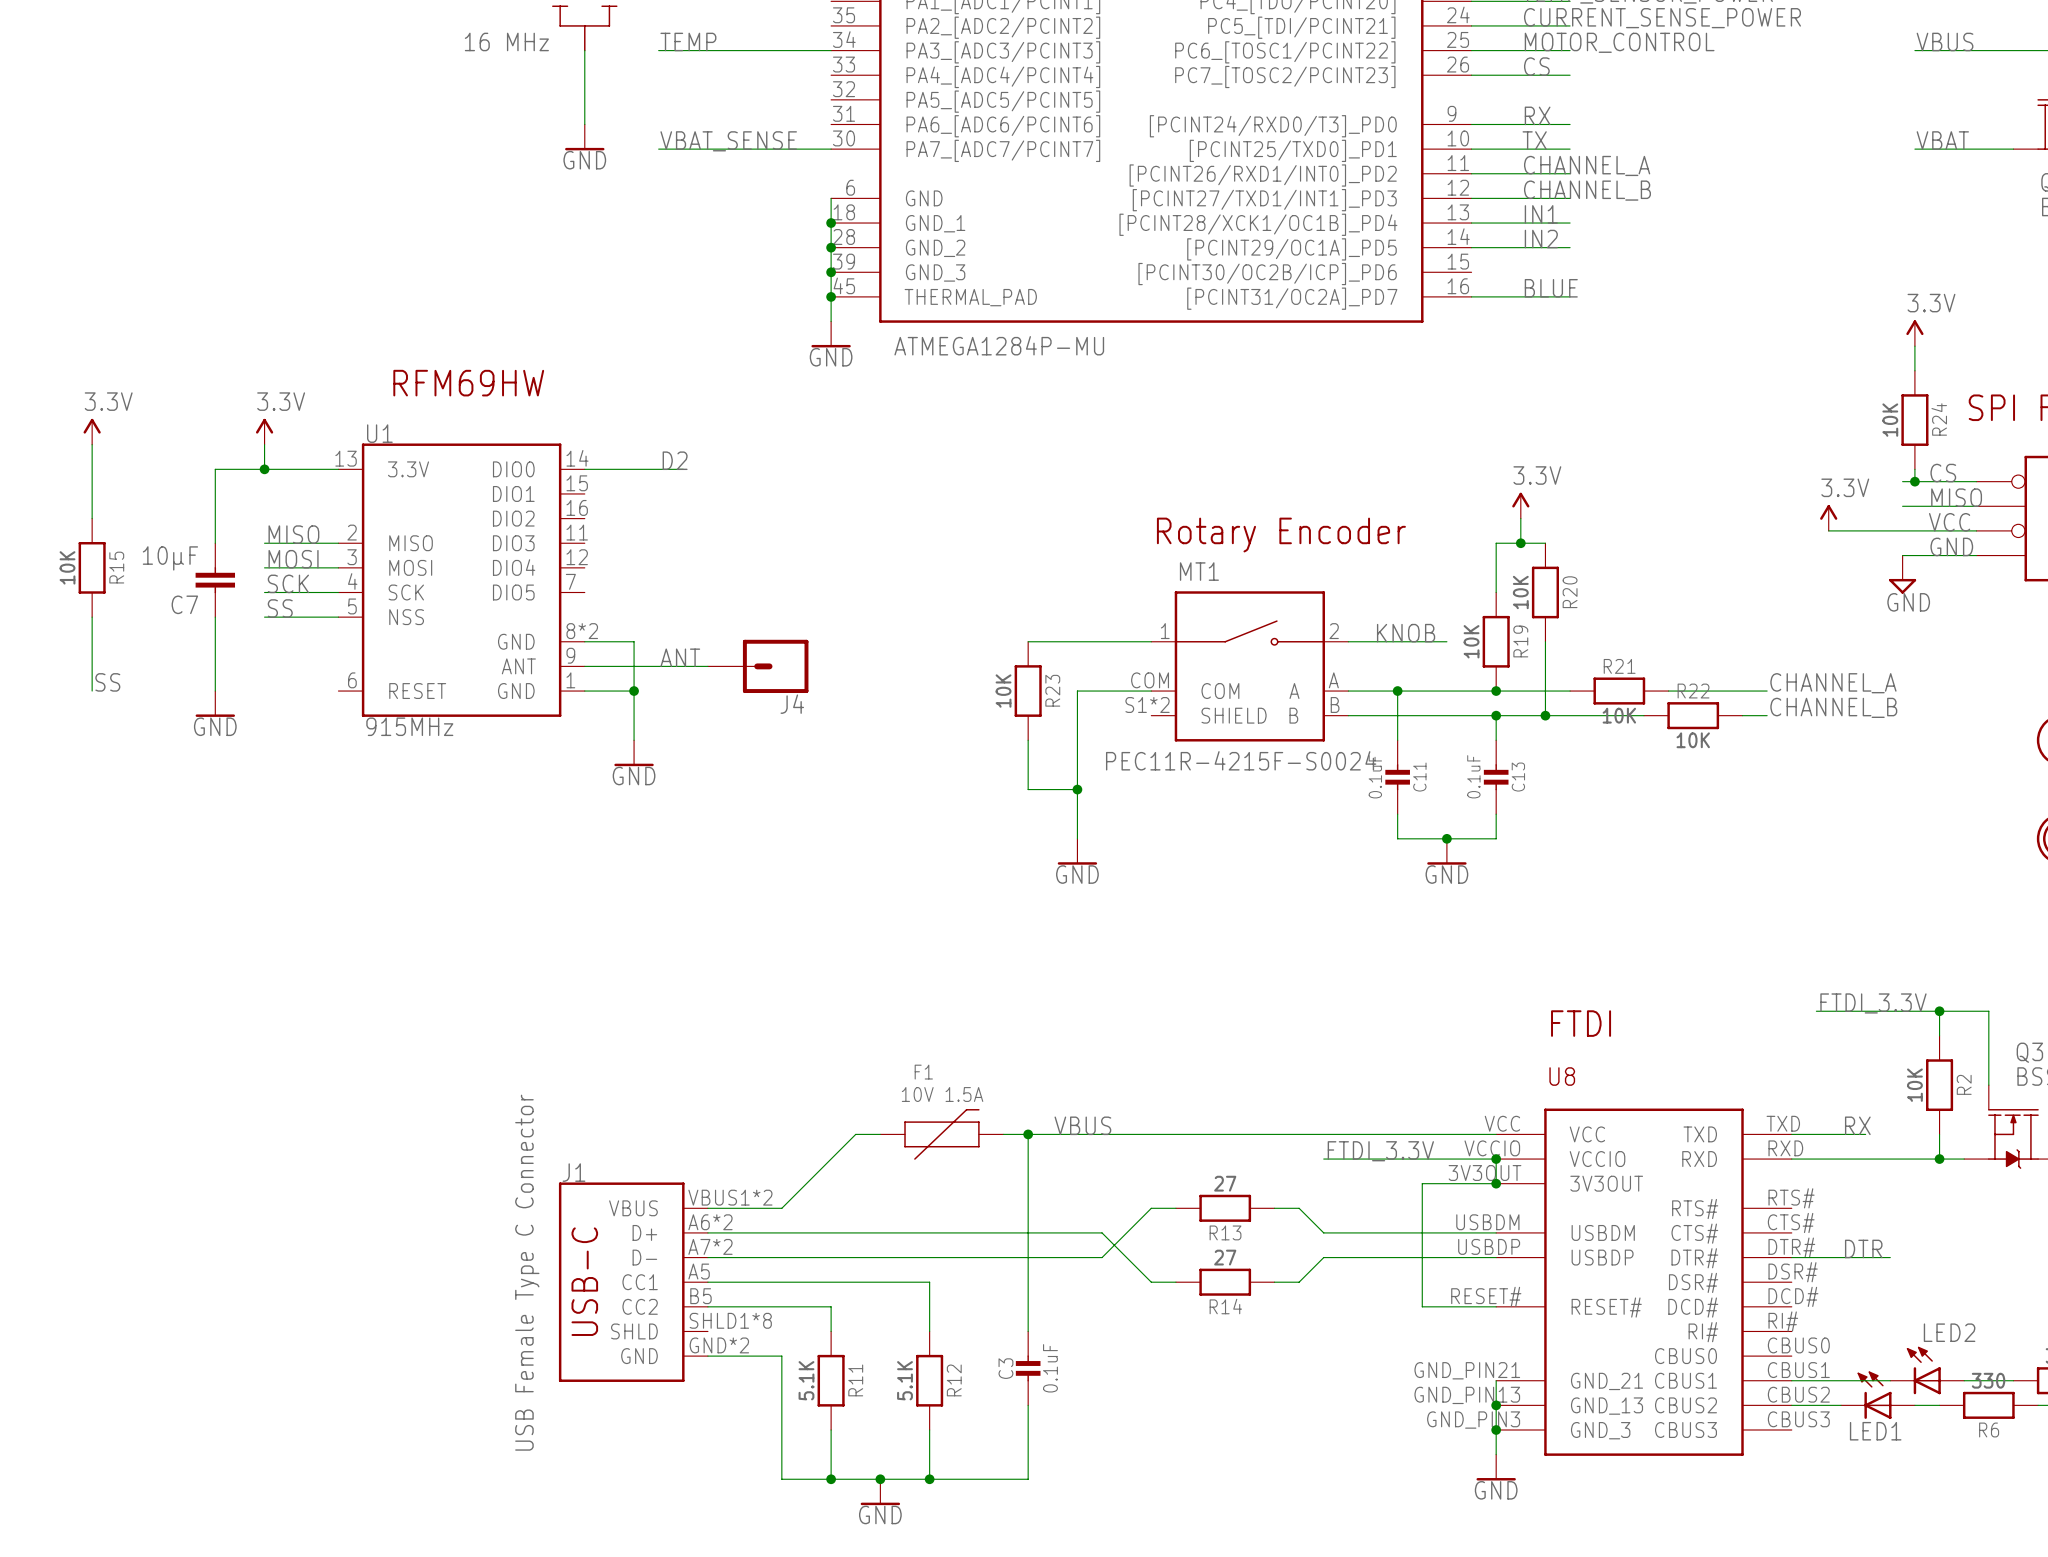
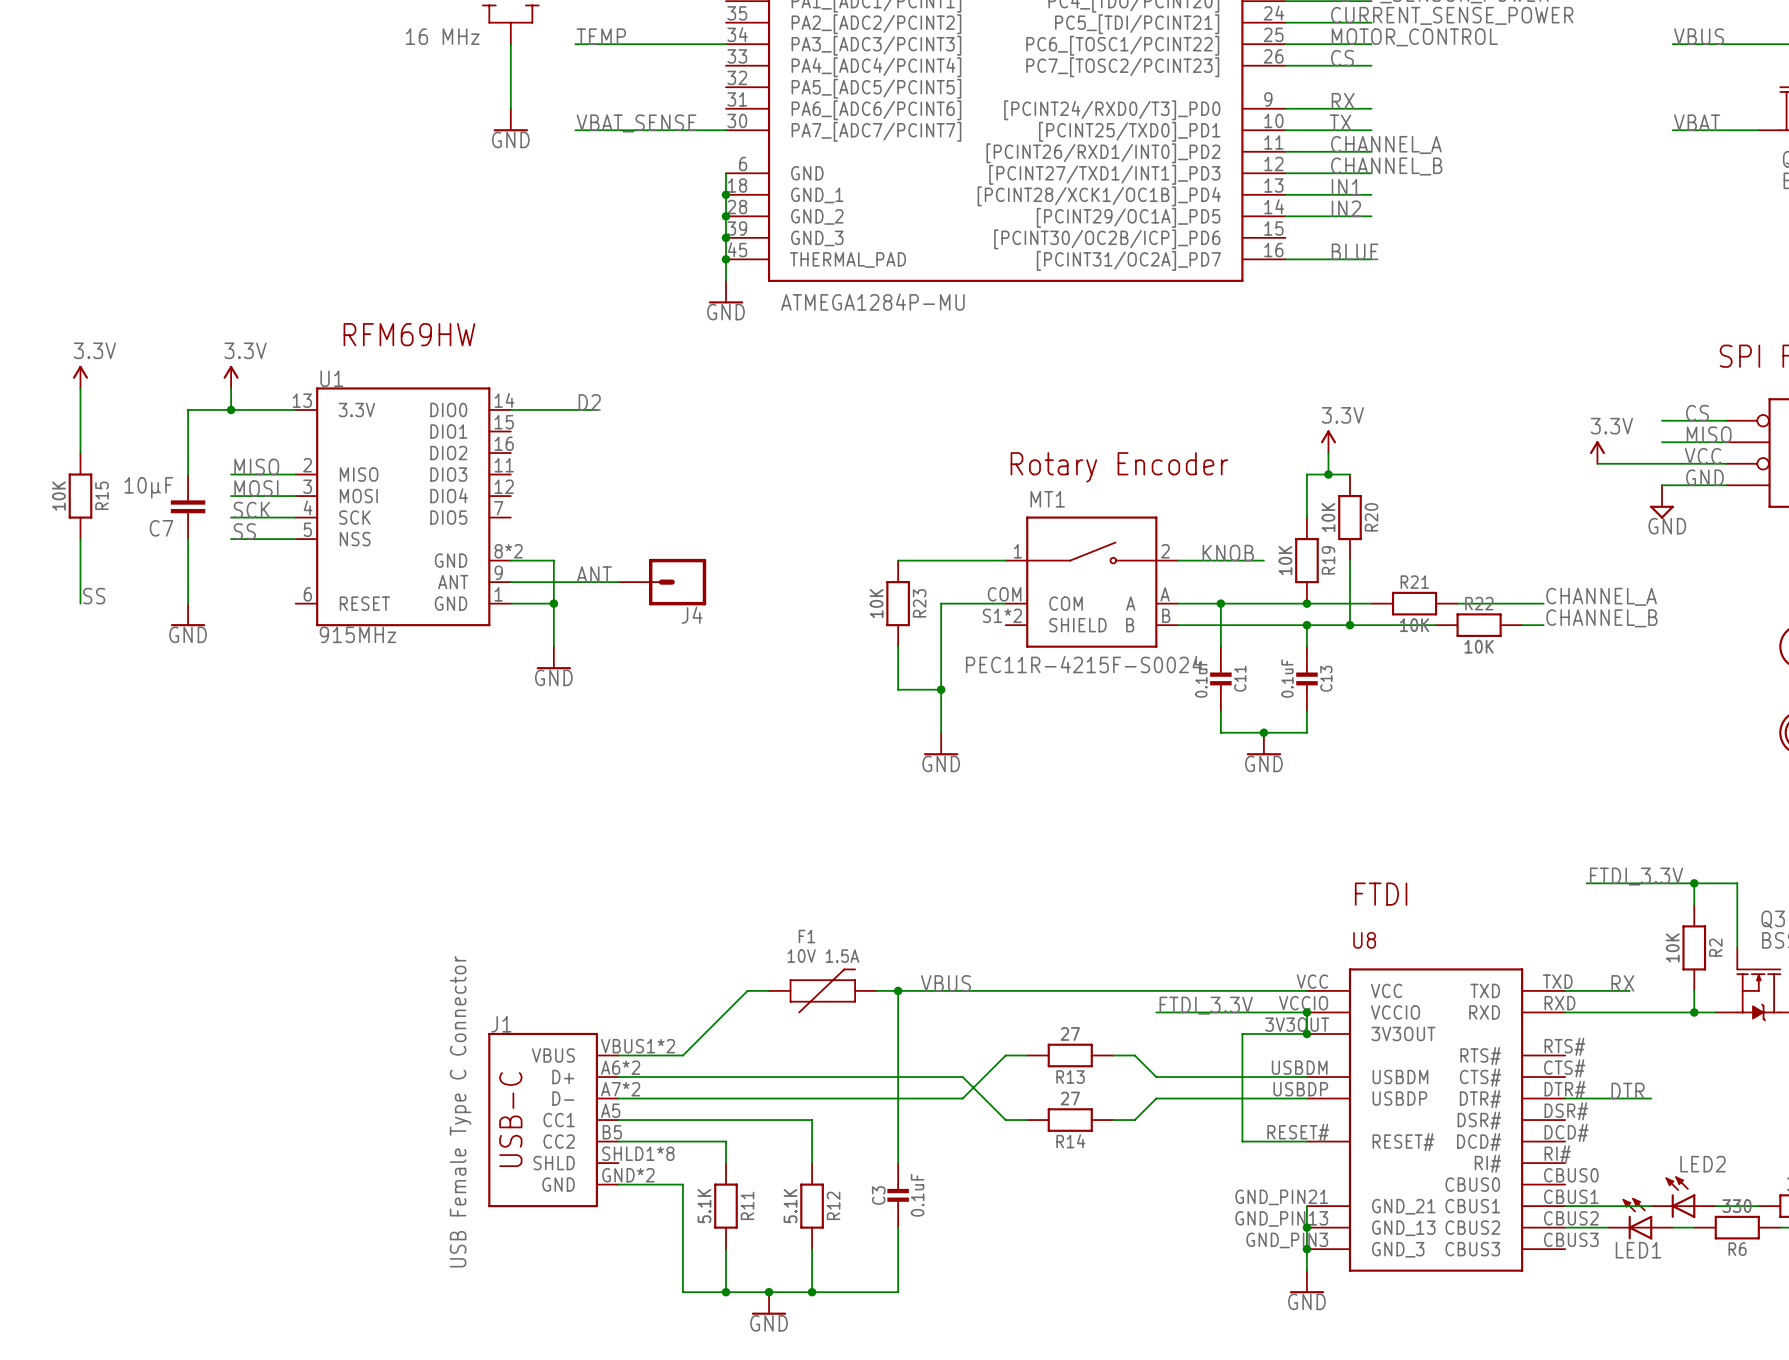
power symbol: 3.3V (1914, 333) -> none
wire: (1914, 346) (1914, 370) -> none
R24: 10K (1914, 420) -> none
wire: (1914, 469) (1914, 481) -> none
junction: (1914, 481) -> none

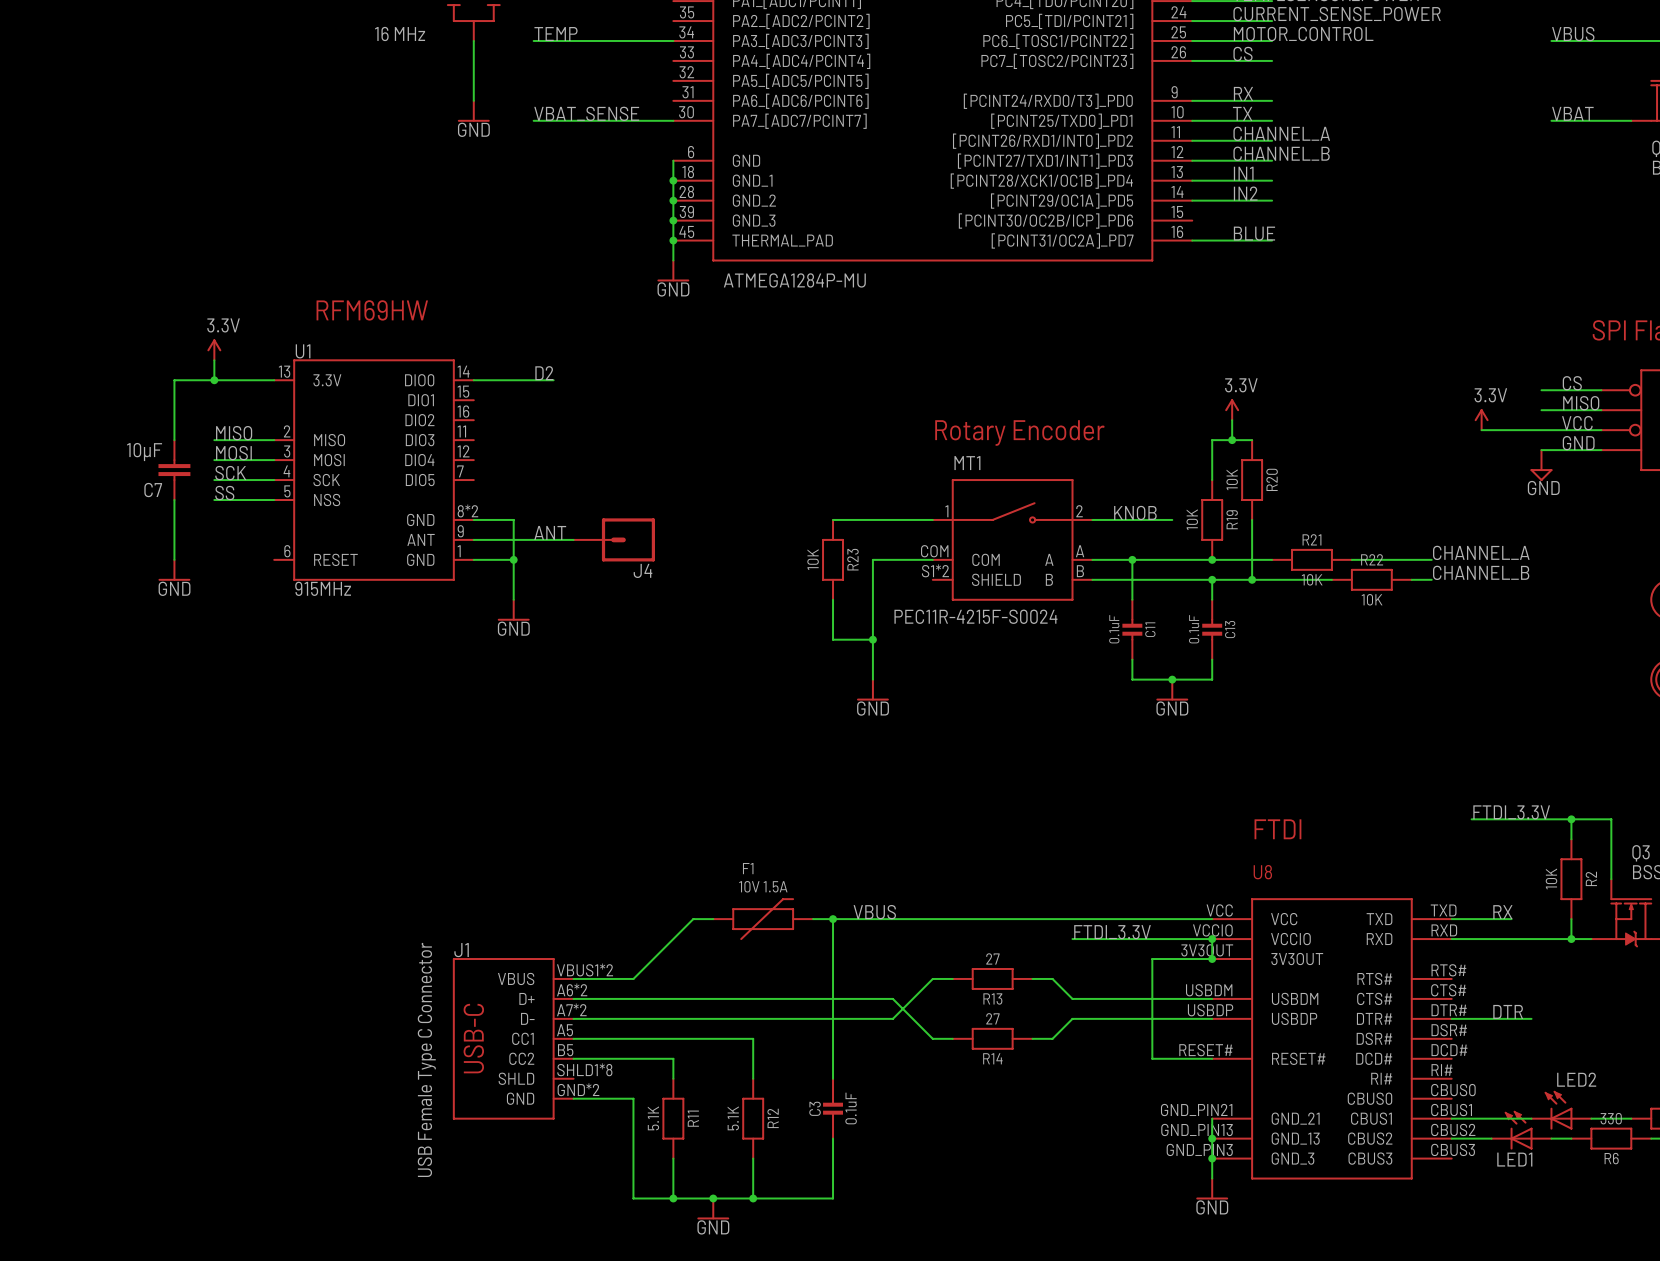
power symbol: 3.3V (80, 377) -> none
wire: (80, 388) (80, 453) -> none
R15: 10K (80, 496) -> none
wire: (80, 539) (80, 603) -> none
label: SS (94, 596) -> none

